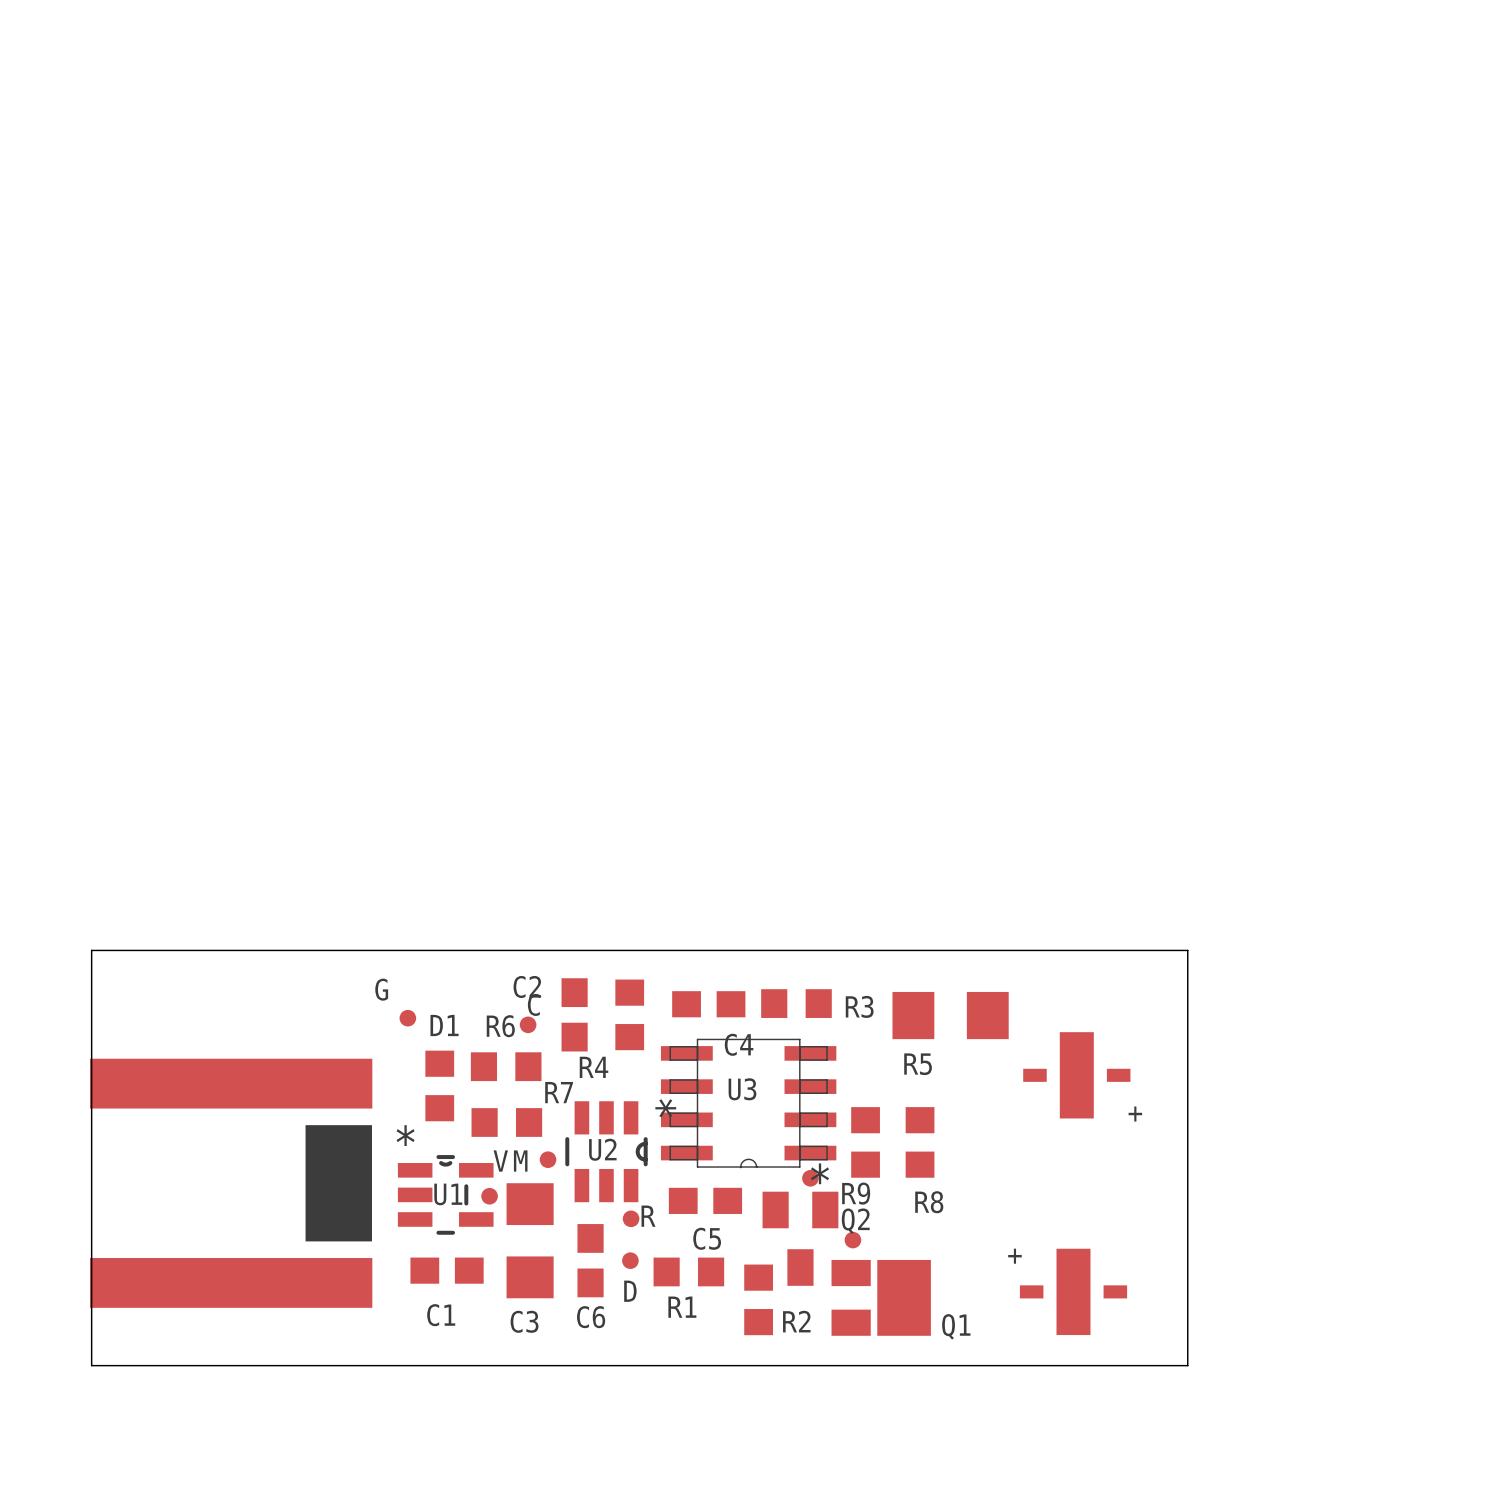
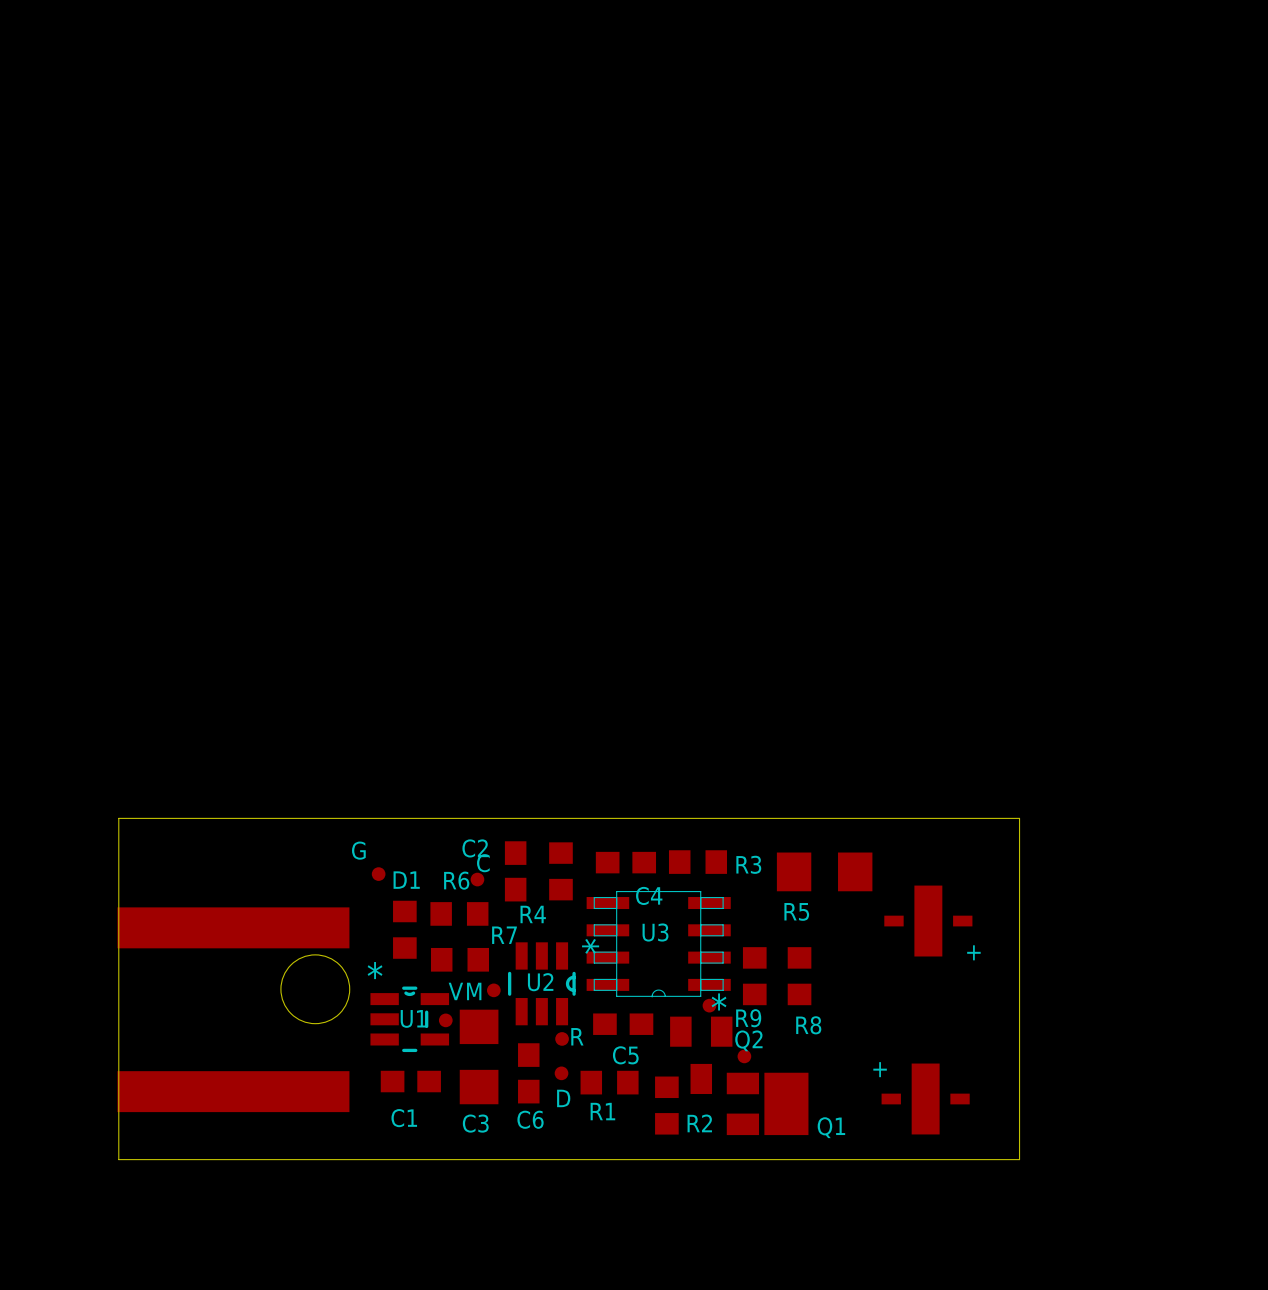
part footprint: [89, 1058, 373, 1308] -> [117, 907, 350, 1113]

